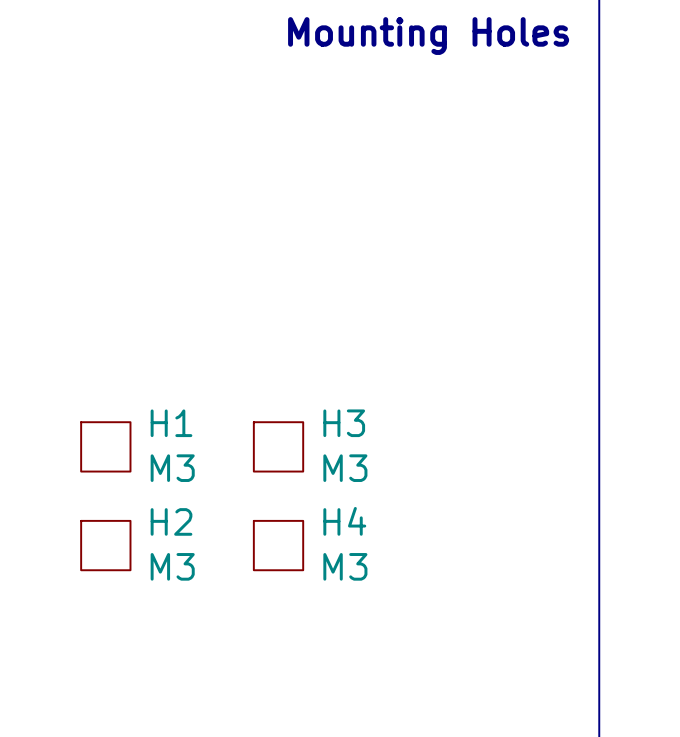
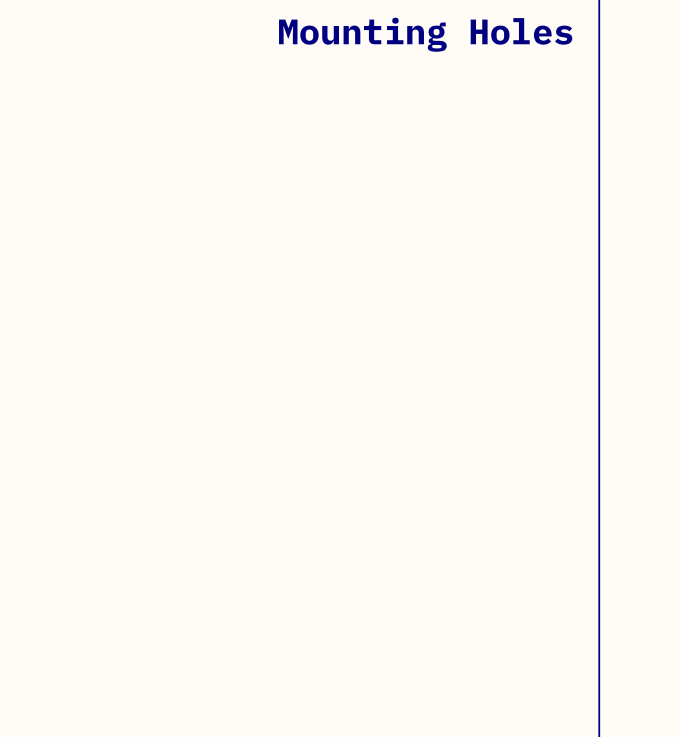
H1: M3 (105, 446) -> none
H3: M3 (278, 446) -> none
H2: M3 (105, 545) -> none
H4: M3 (278, 545) -> none

